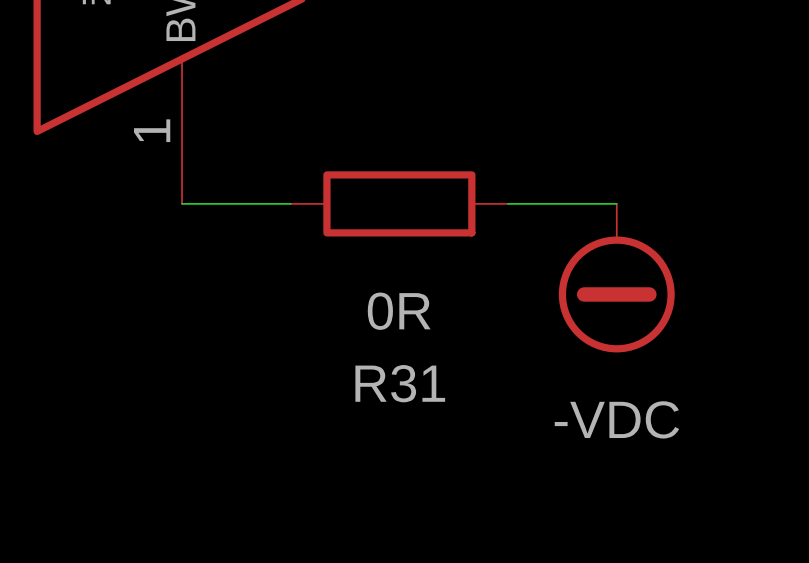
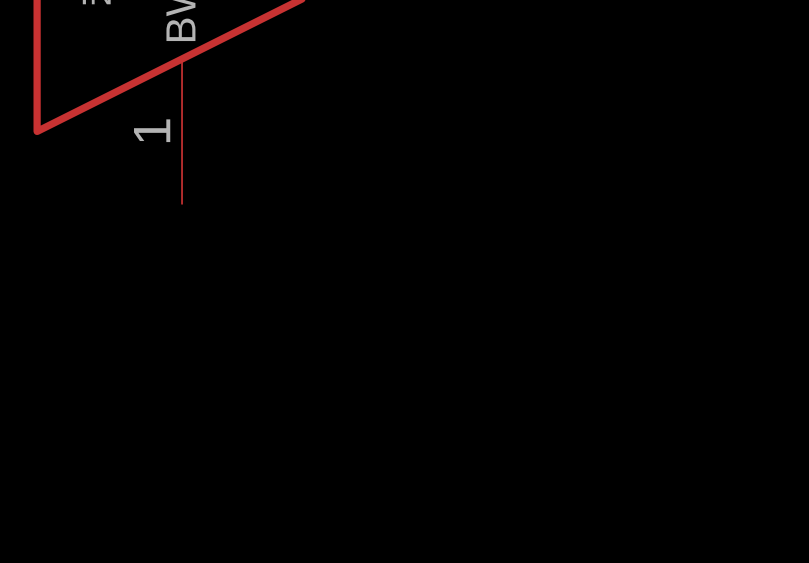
wire: (182, 203) (290, 203) -> none
R31: 0R (399, 203) -> none
wire: (508, 203) (616, 203) -> none
power symbol: -VDC (616, 278) -> none

